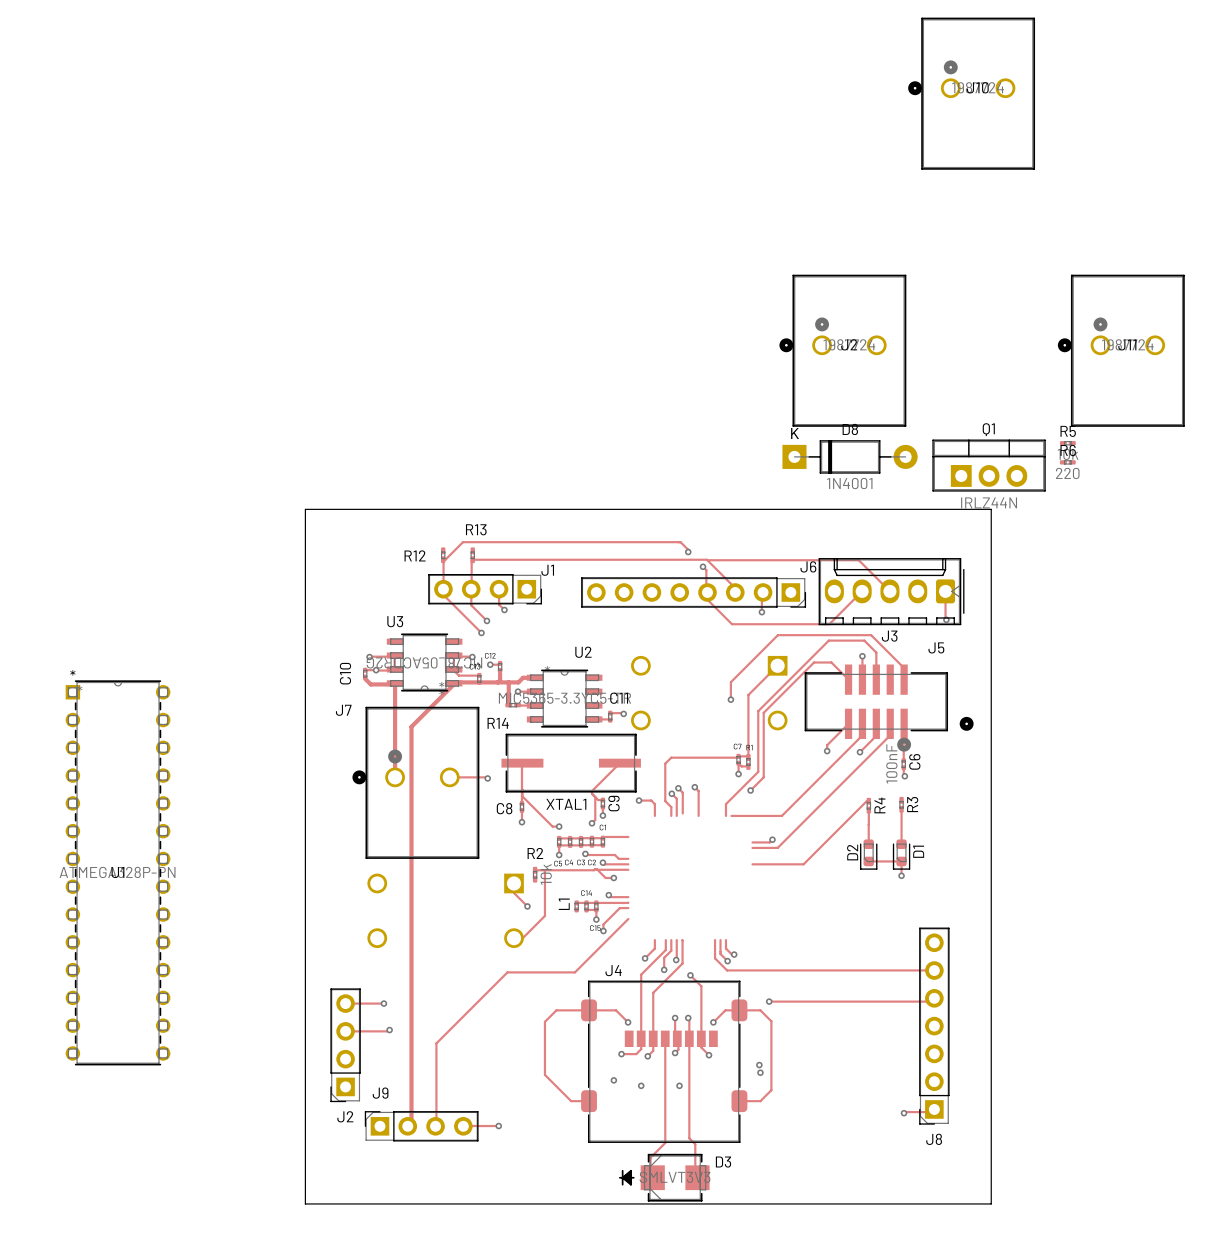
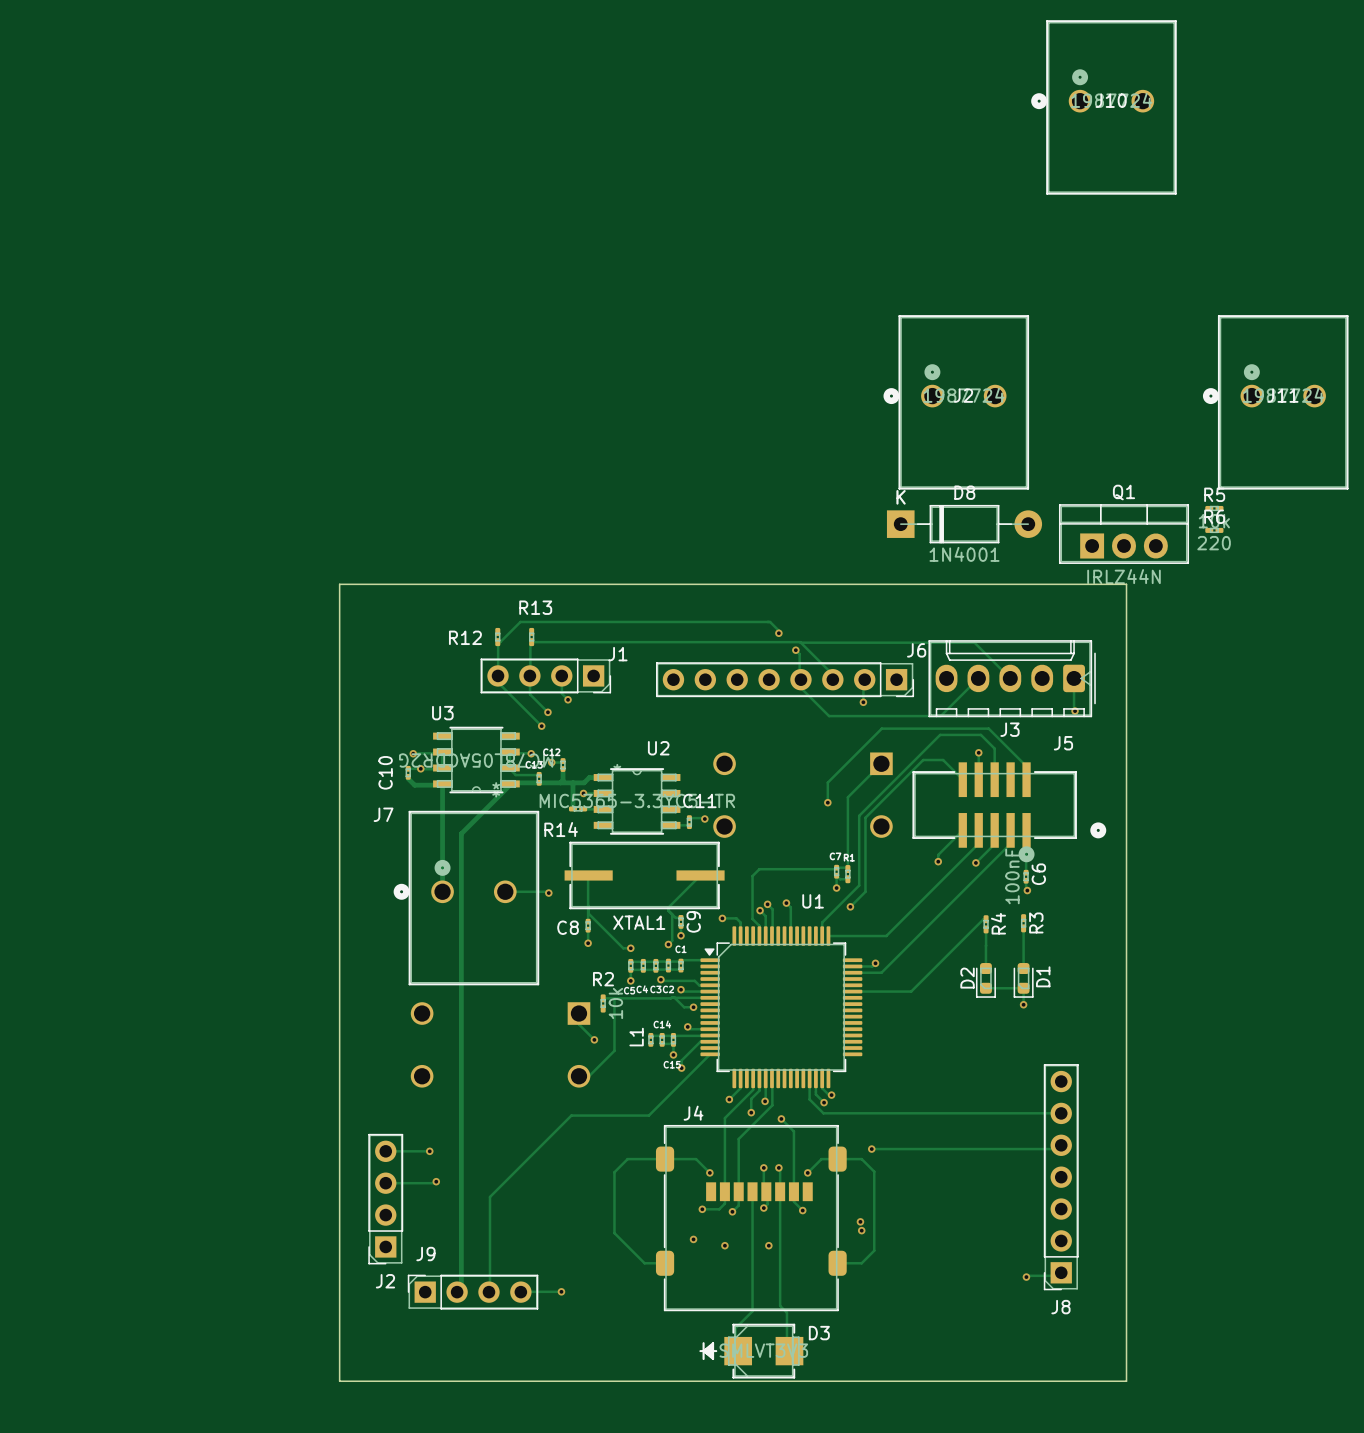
U1 footprint: [65, 680, 171, 1066] -> [700, 926, 863, 1089]
U1 name position: U1 (117, 872) -> U1 (813, 901)
U1 value: ATMEGA328P-PN (117, 872) -> none

